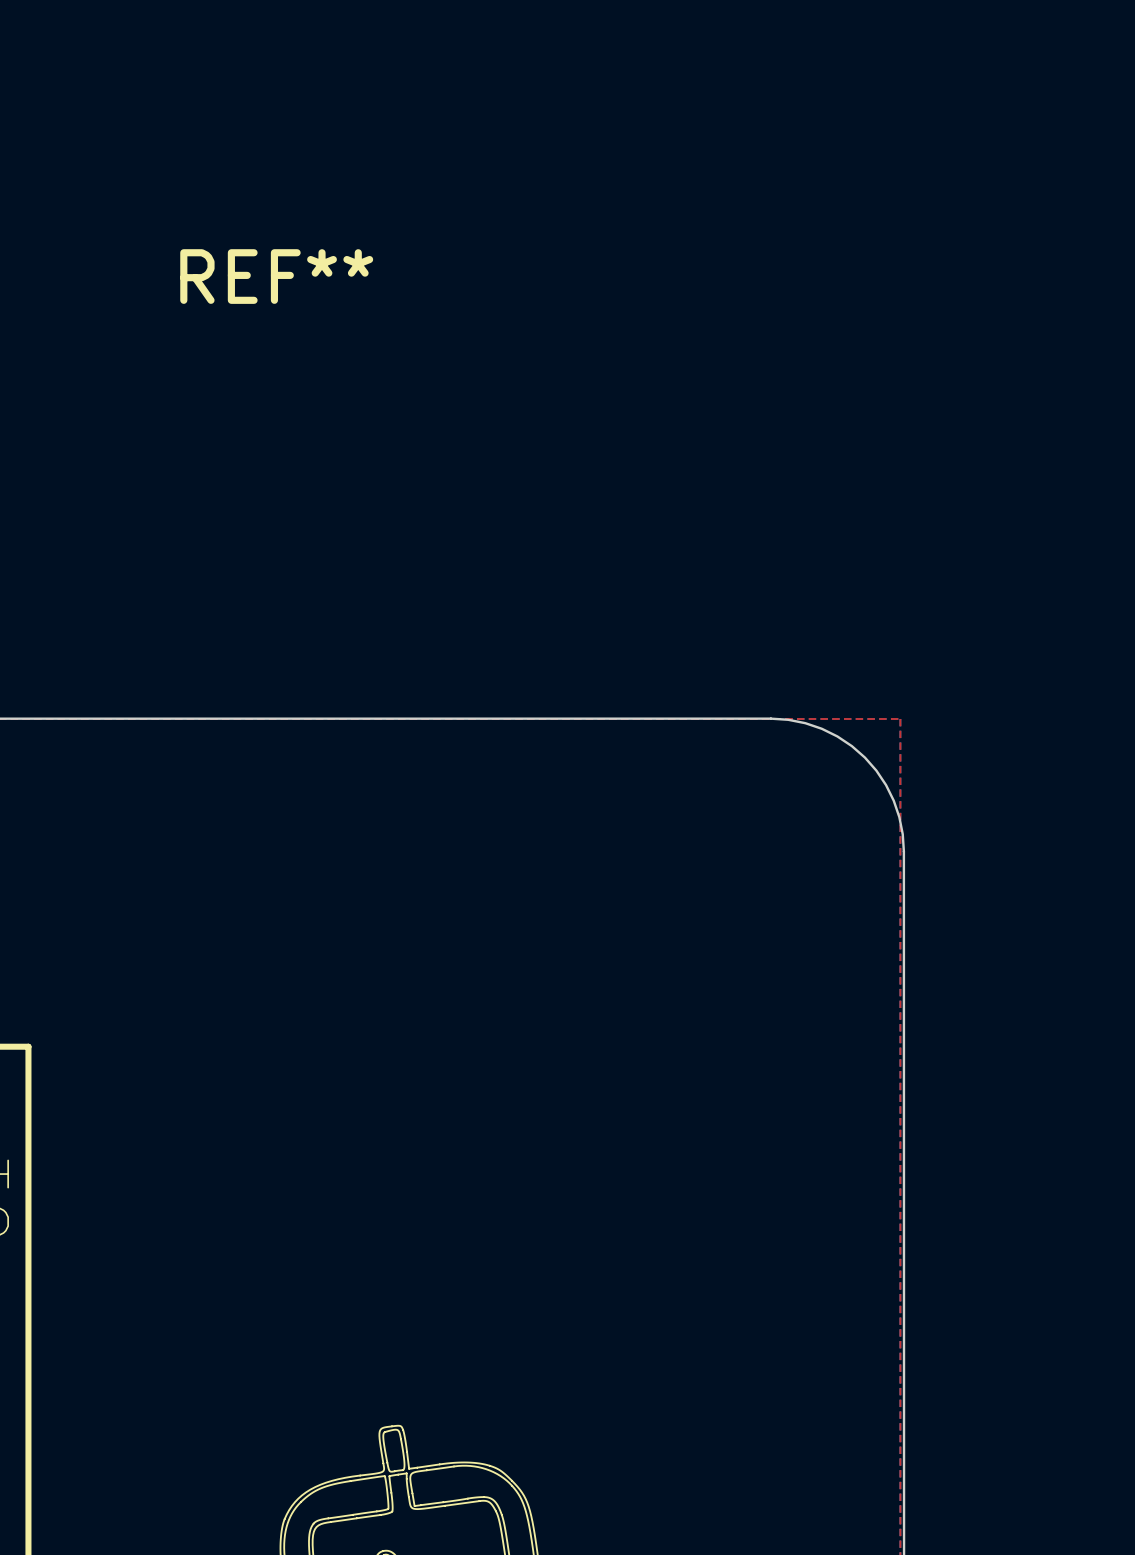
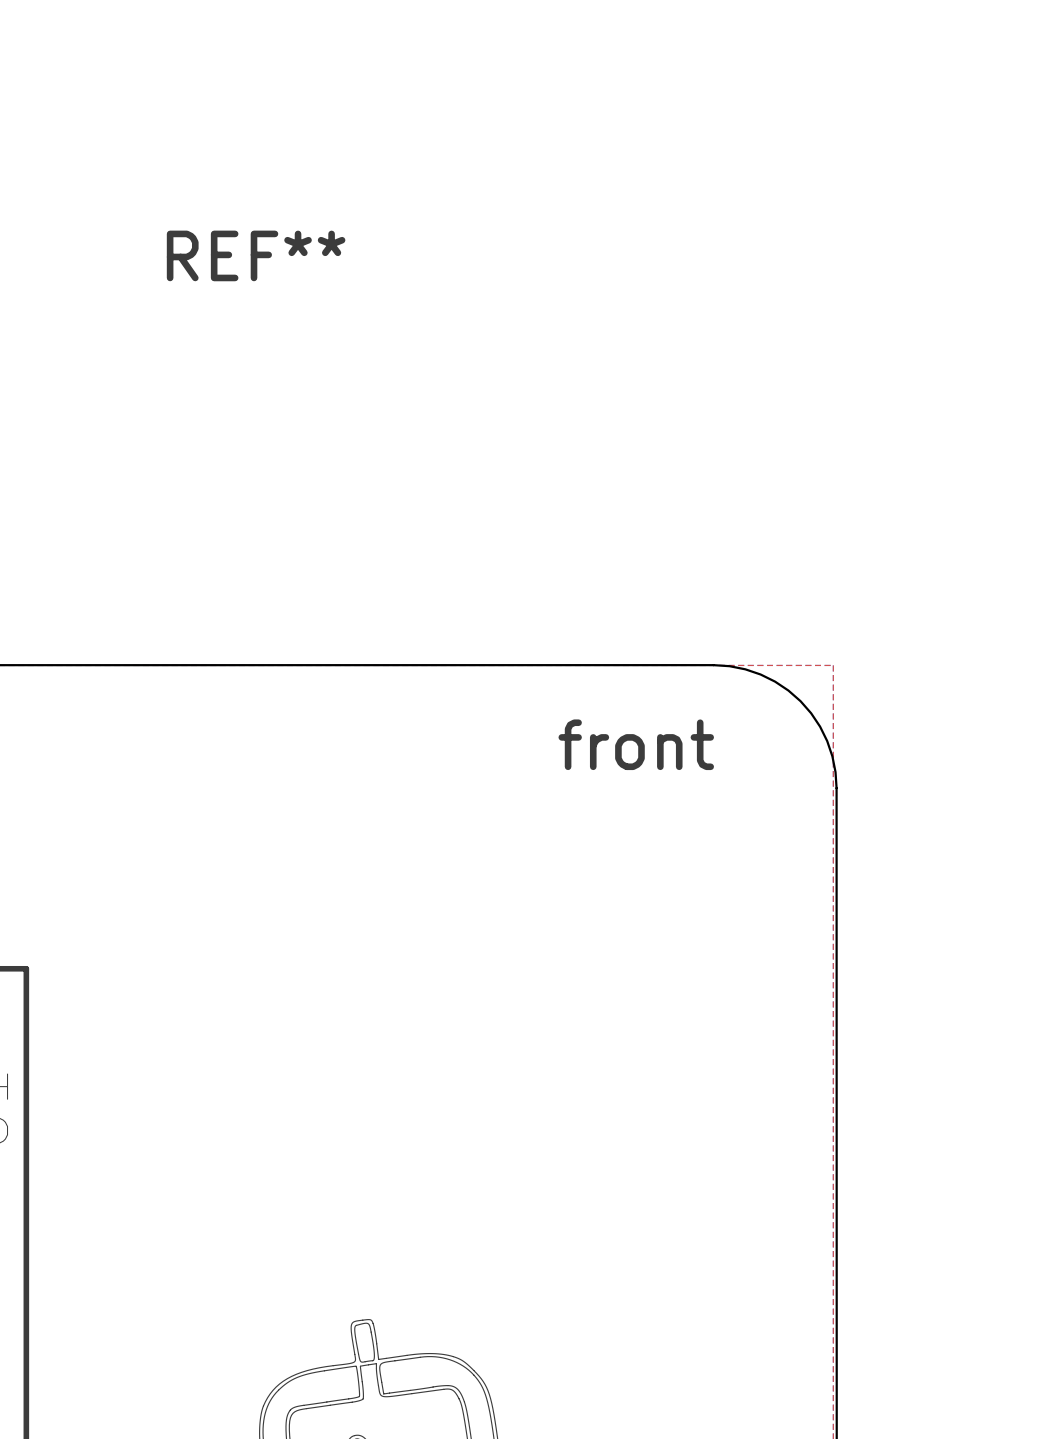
text: none -> front (636, 744)

